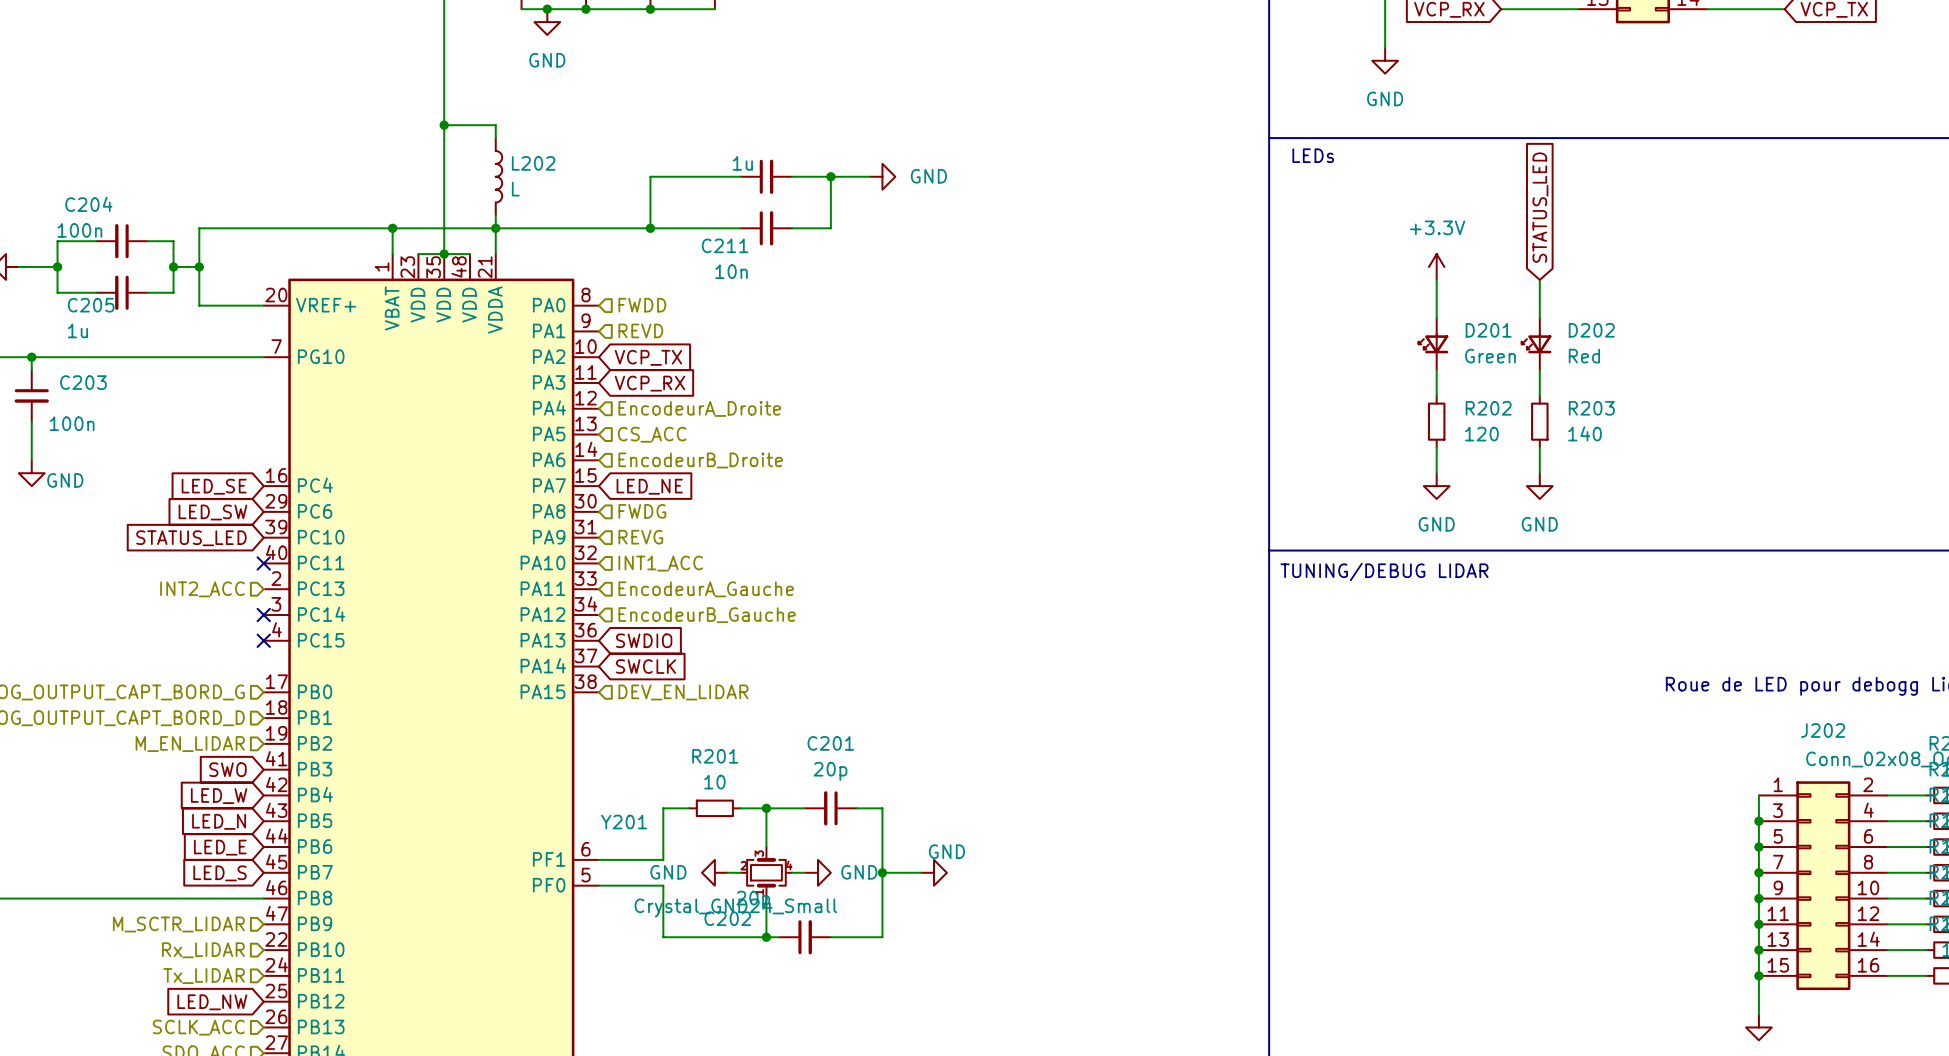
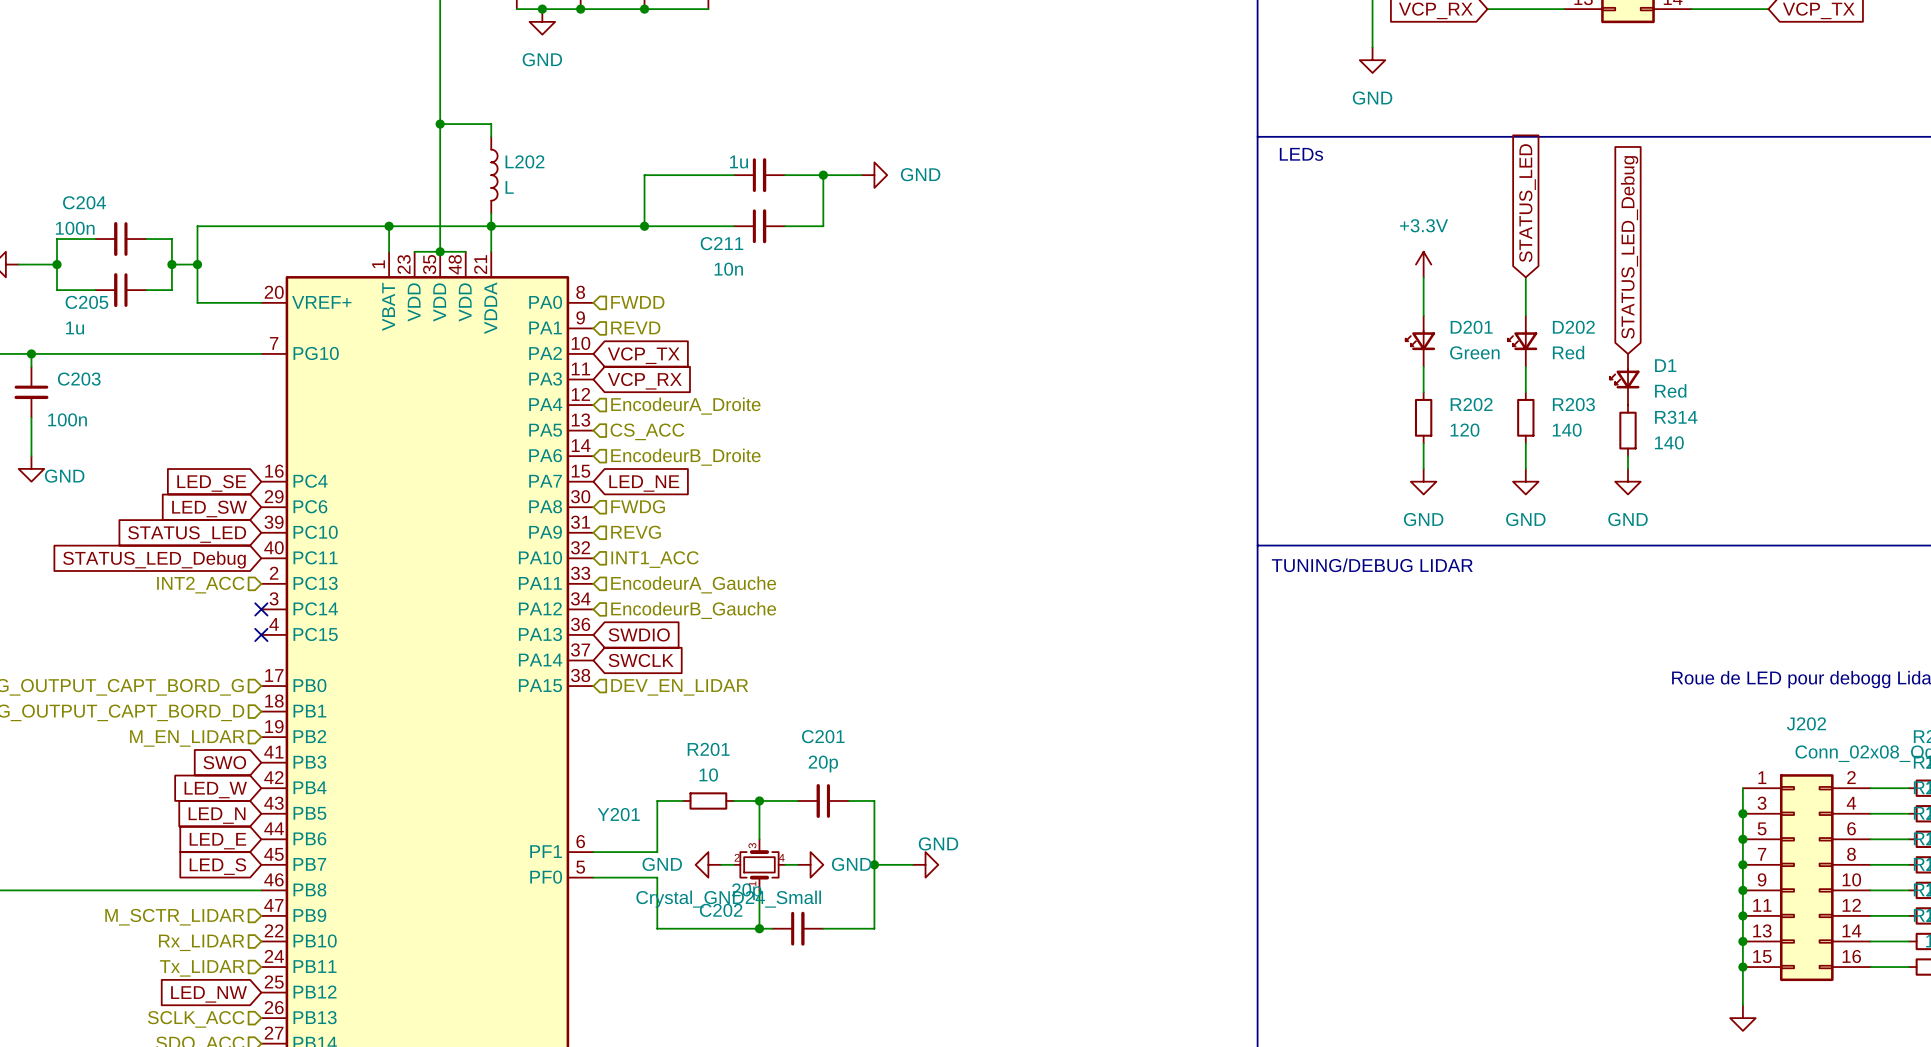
global label: none -> STATUS_LED_Debug (1629, 247)
D1: none -> Red (1624, 379)
R314: none -> 140 (1627, 430)
wire: none -> (1627, 456) (1627, 468)
power symbol: none -> GND (1627, 481)
no-connect mark: (263, 563) -> none
global label: none -> STATUS_LED_Debug (154, 559)

